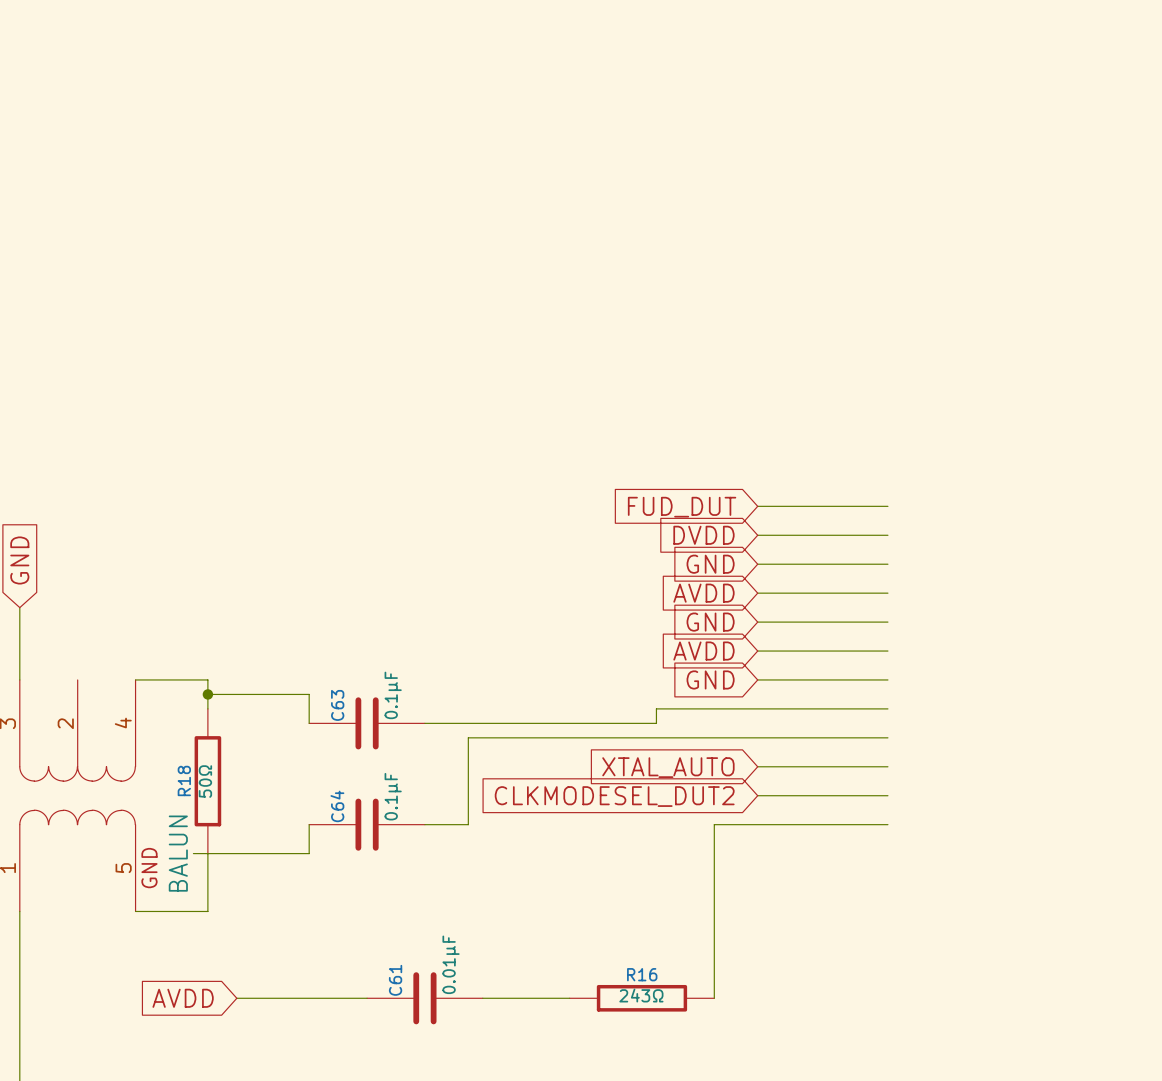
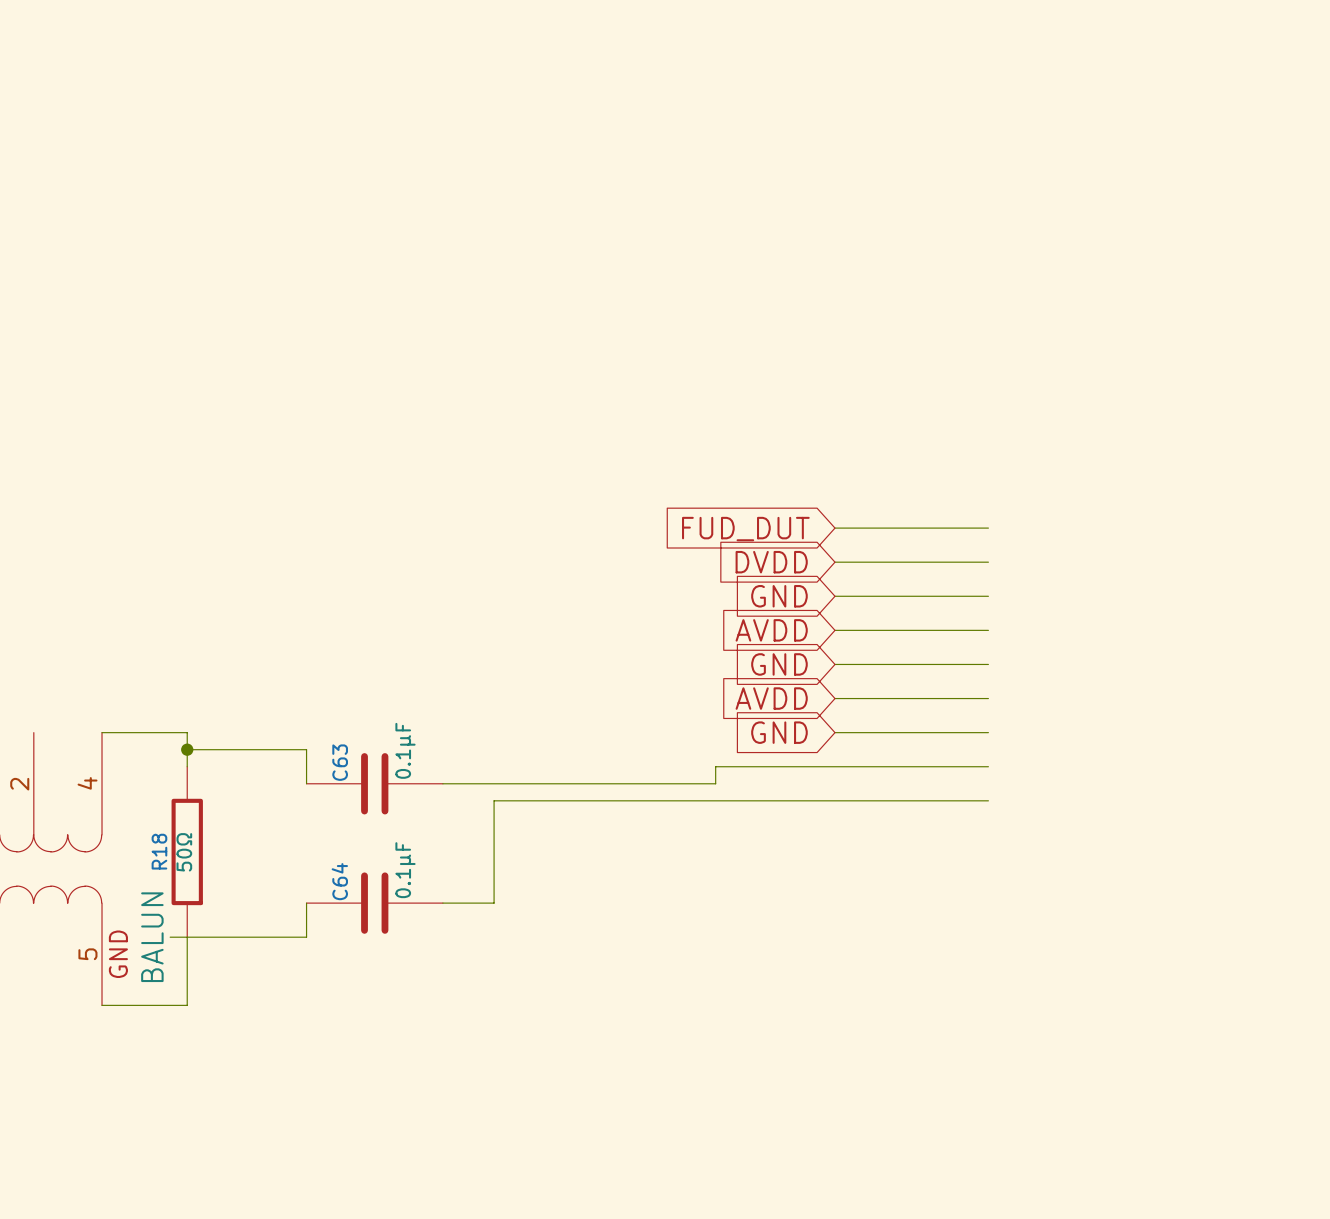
wire: (757, 766) (887, 766) -> none
global label: XTAL_AUTO (668, 767) -> none
wire: (757, 795) (887, 795) -> none
global label: CLKMODESEL_DUT2 (614, 796) -> none
wire: (887, 824) (714, 824) (714, 998) -> none
global label: AVDD (183, 998) -> none
wire: (236, 998) (367, 998) -> none
C61: 0.01μF (424, 998) -> none
wire: (482, 998) (569, 998) -> none
R16: 243Ω (641, 998) -> none

